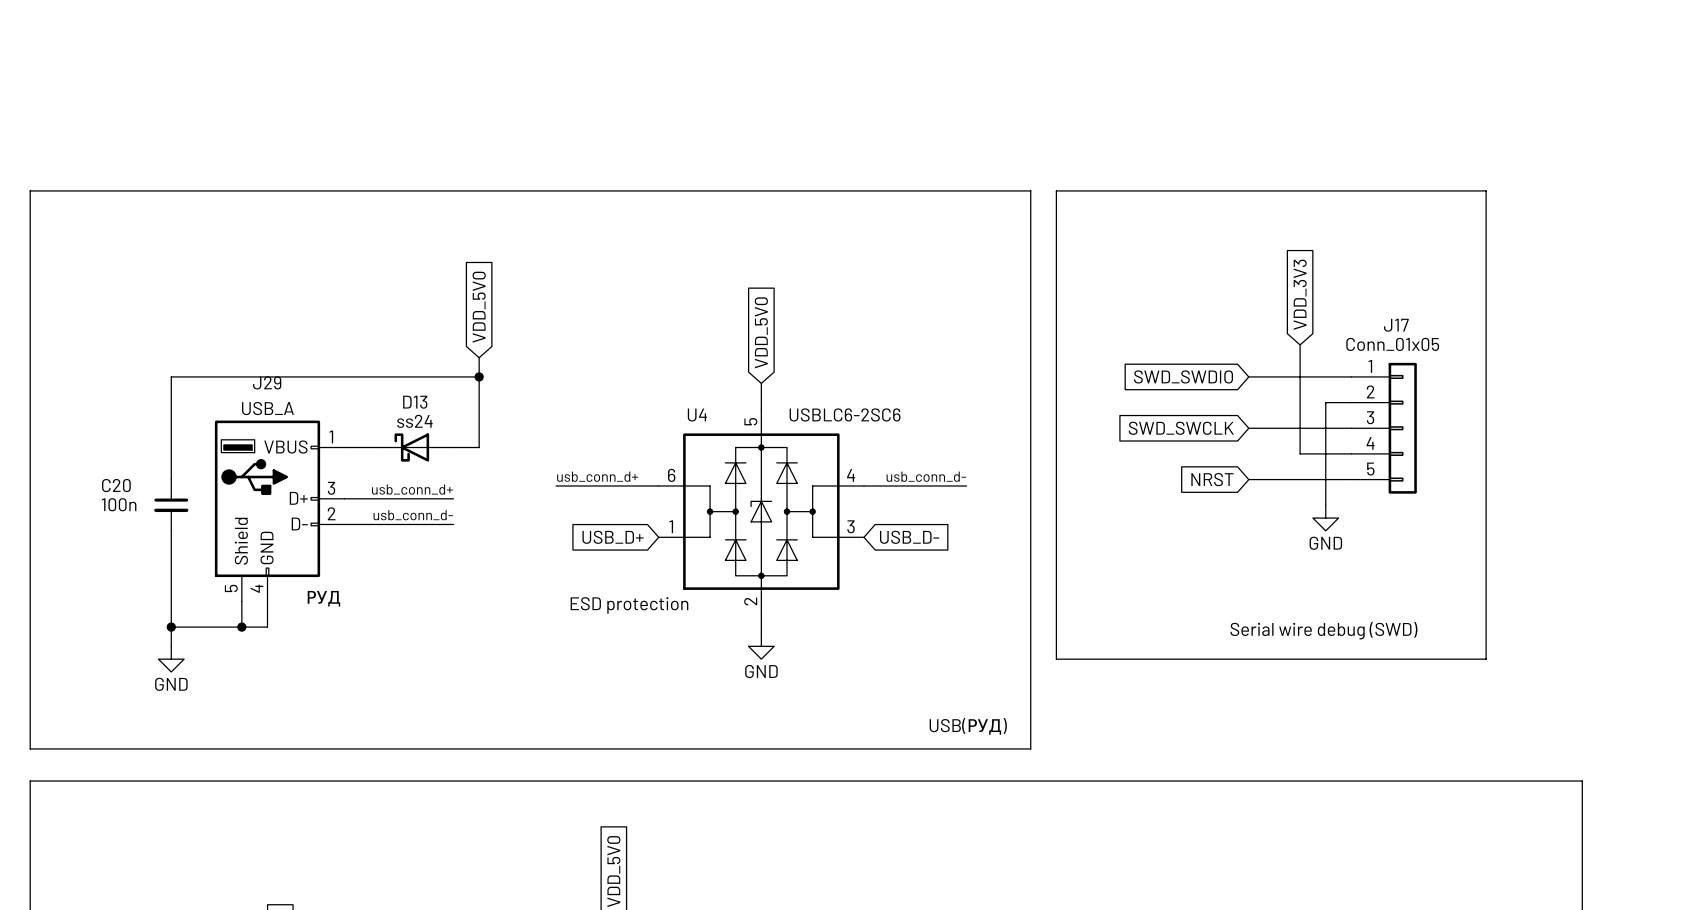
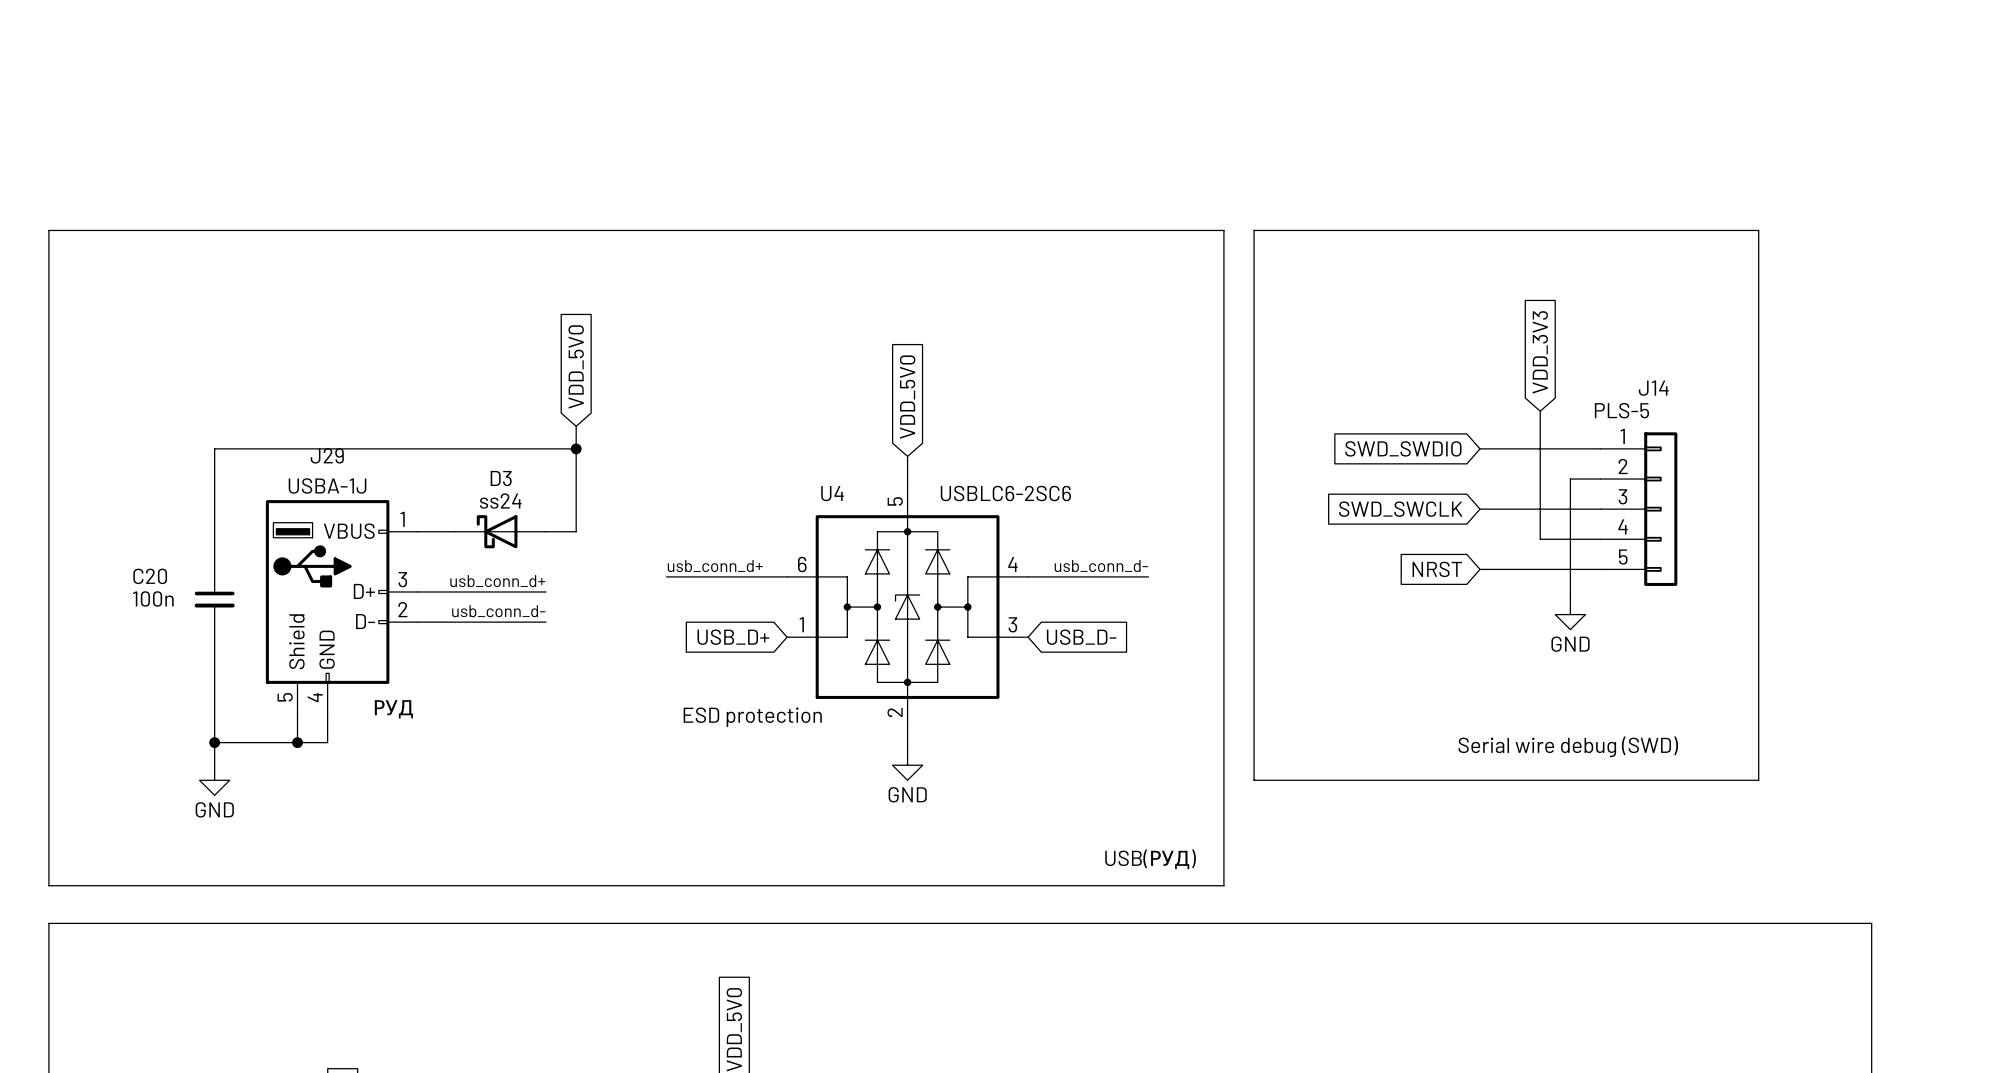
J17 name: J17 (1396, 325) -> J14 (1653, 388)
J17 value: Conn_01x05 (1392, 344) -> PLS-5 (1621, 410)
D13 name: D13 (415, 402) -> D3 (501, 478)
J29 value: USB_A (267, 408) -> USBA-1J (327, 485)

